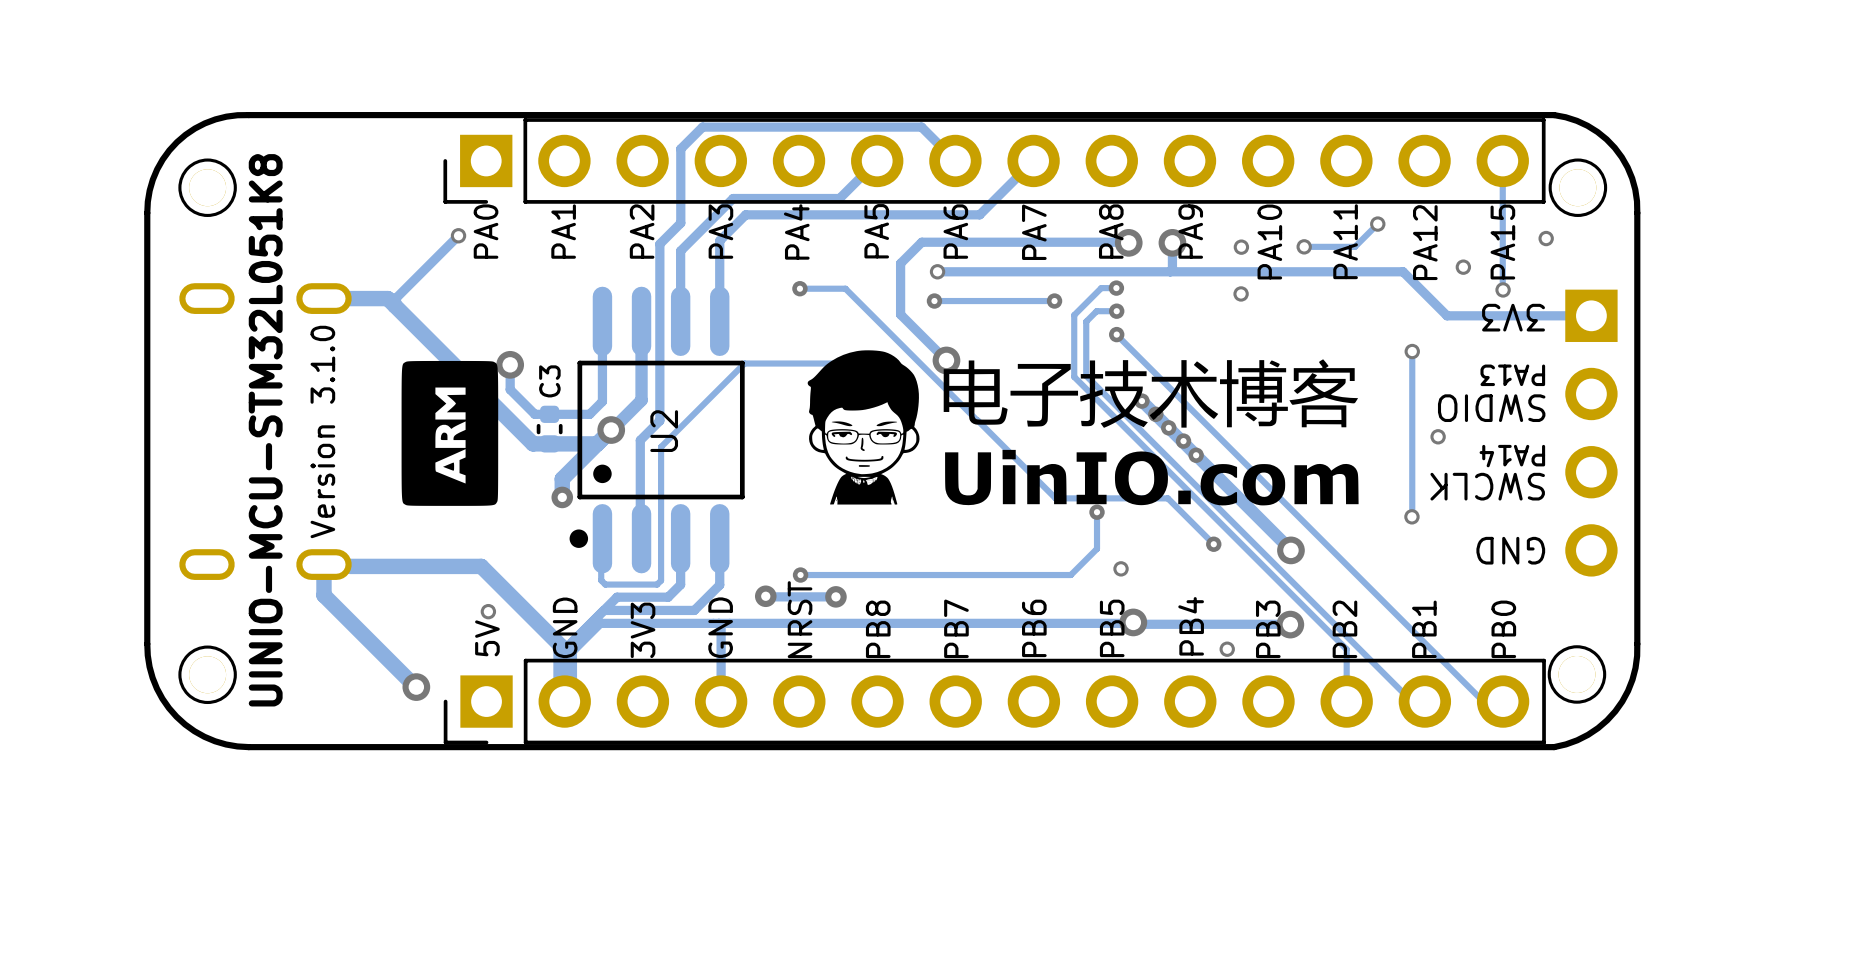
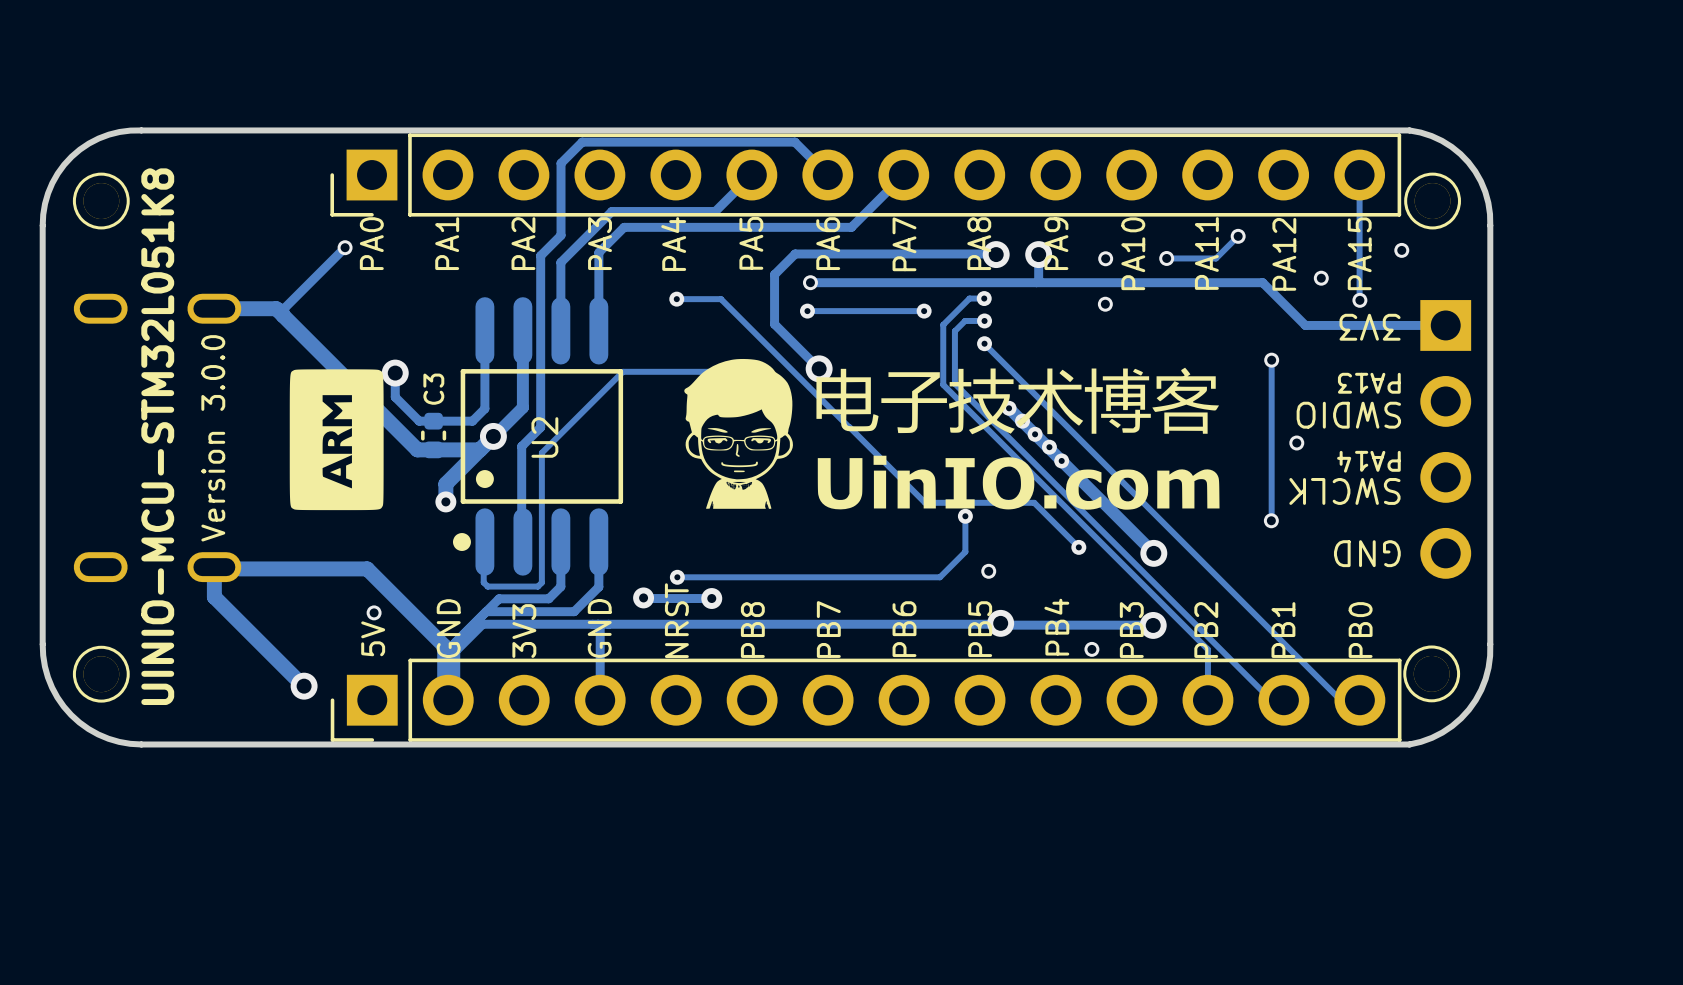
text: Version 3.1.0 (322, 431) -> Version 3.0.0 (213, 438)

